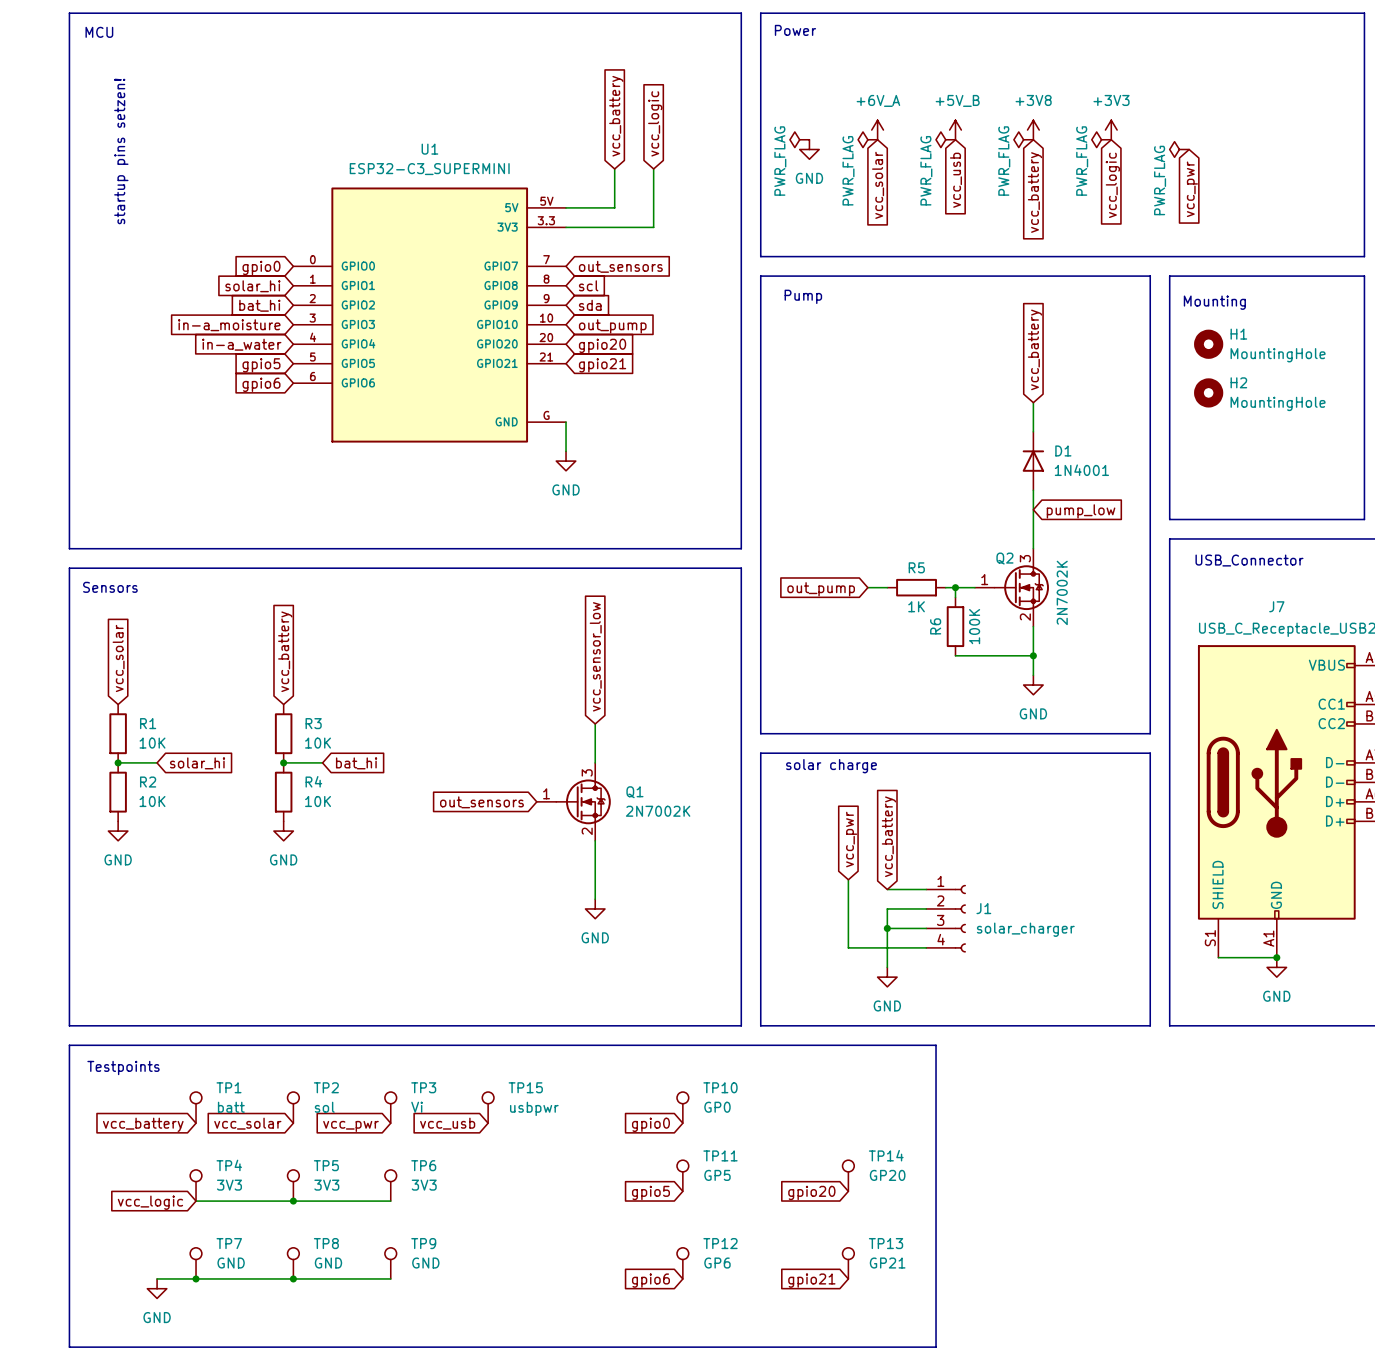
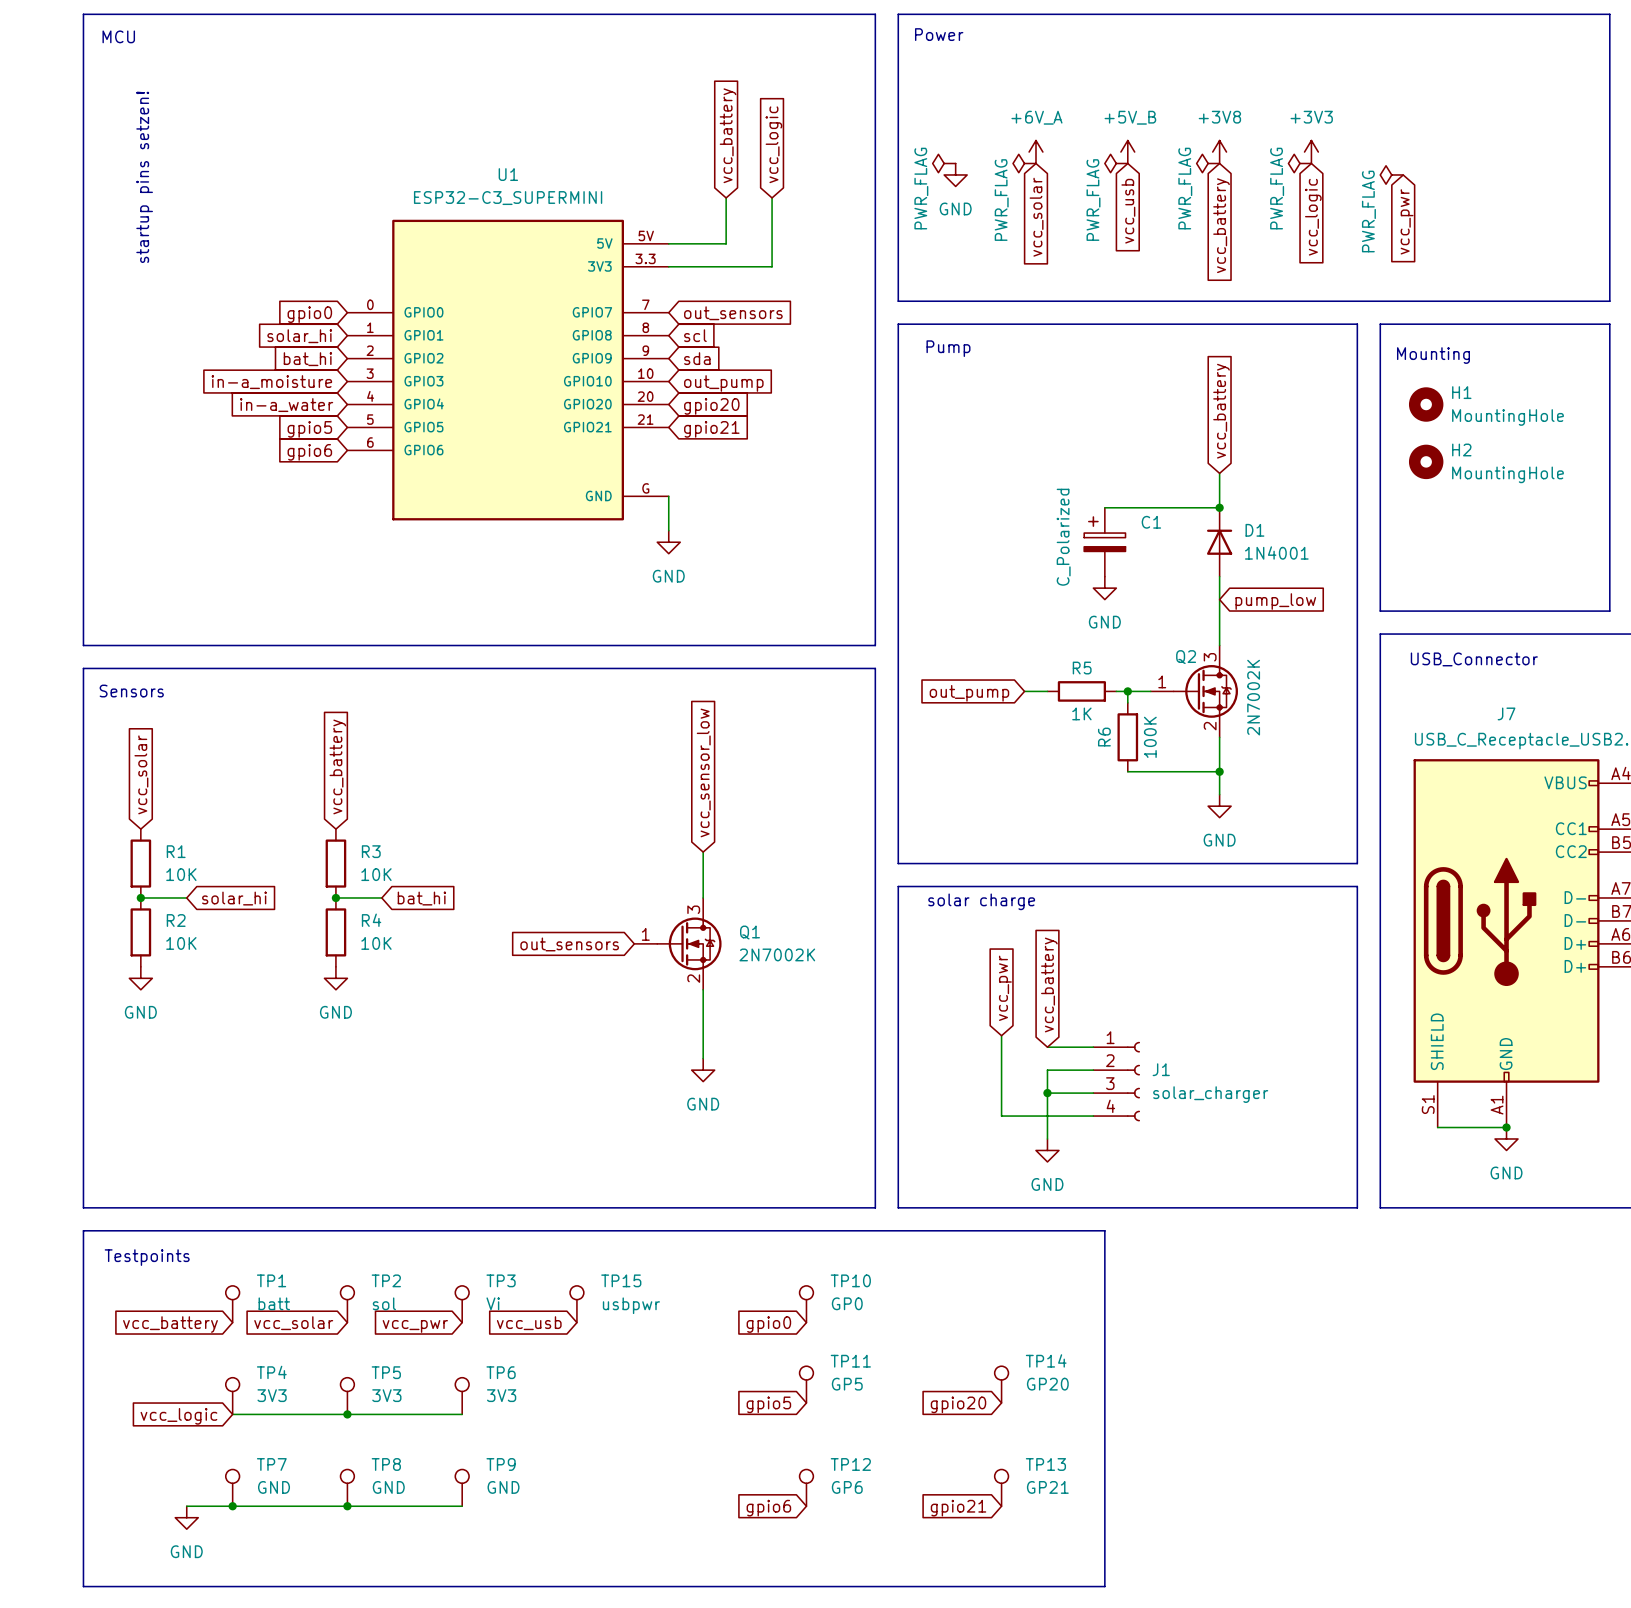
wire: none -> (1104, 507) (1219, 507)
junction: none -> (1219, 507)
C1: none -> C_Polarized (1104, 542)
power symbol: none -> GND (1104, 588)

